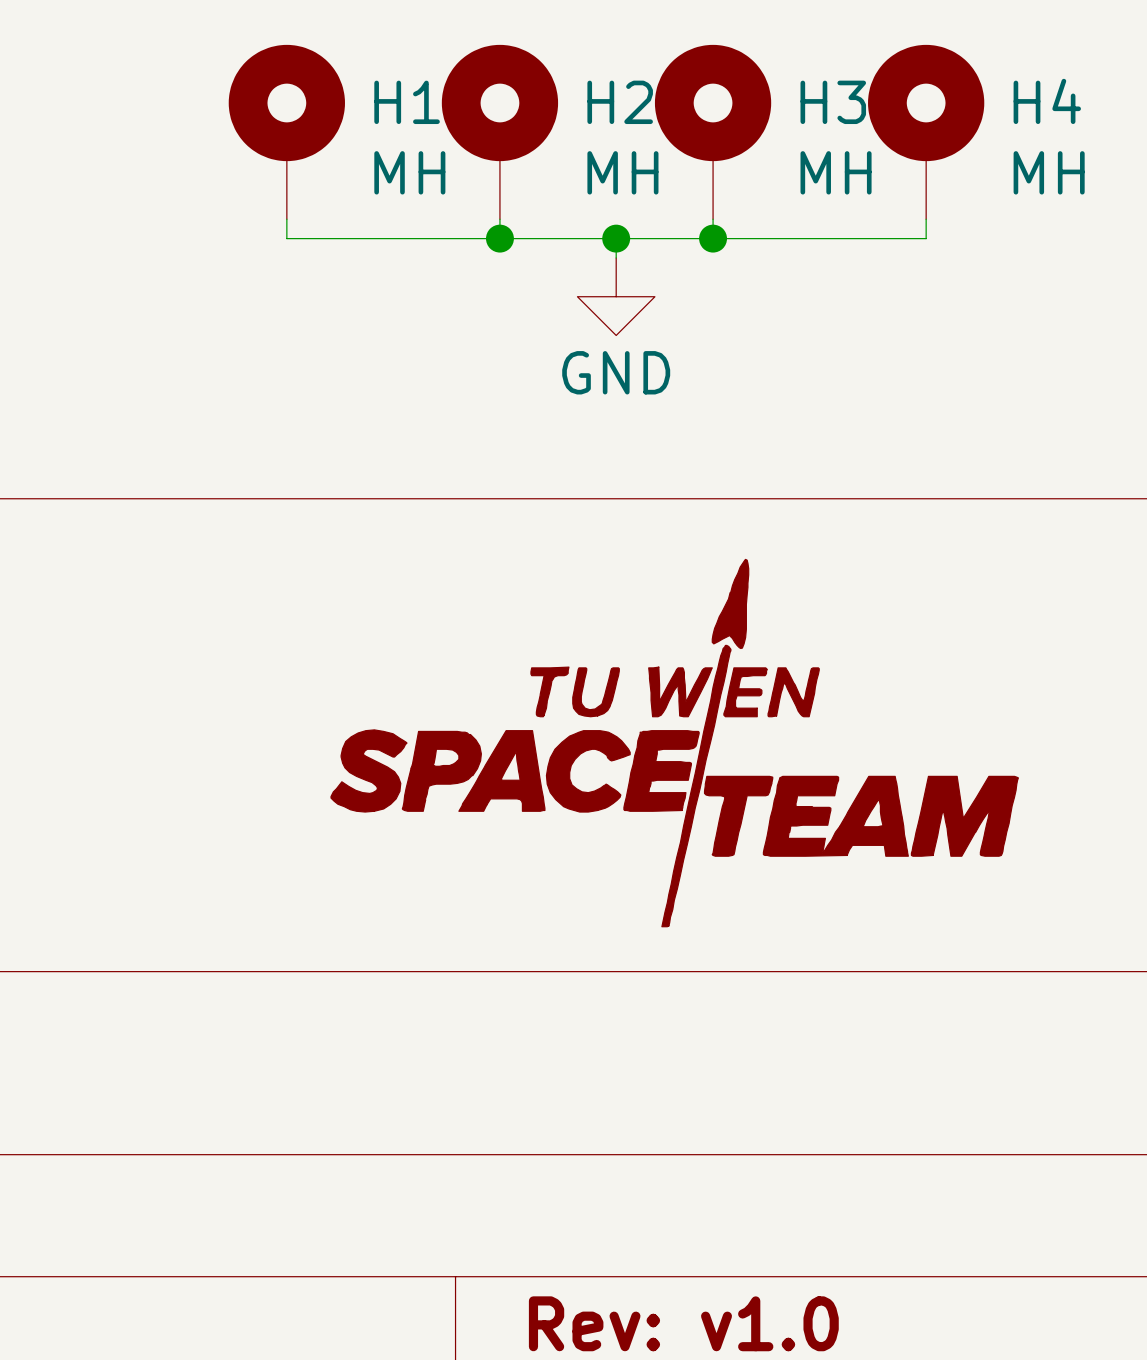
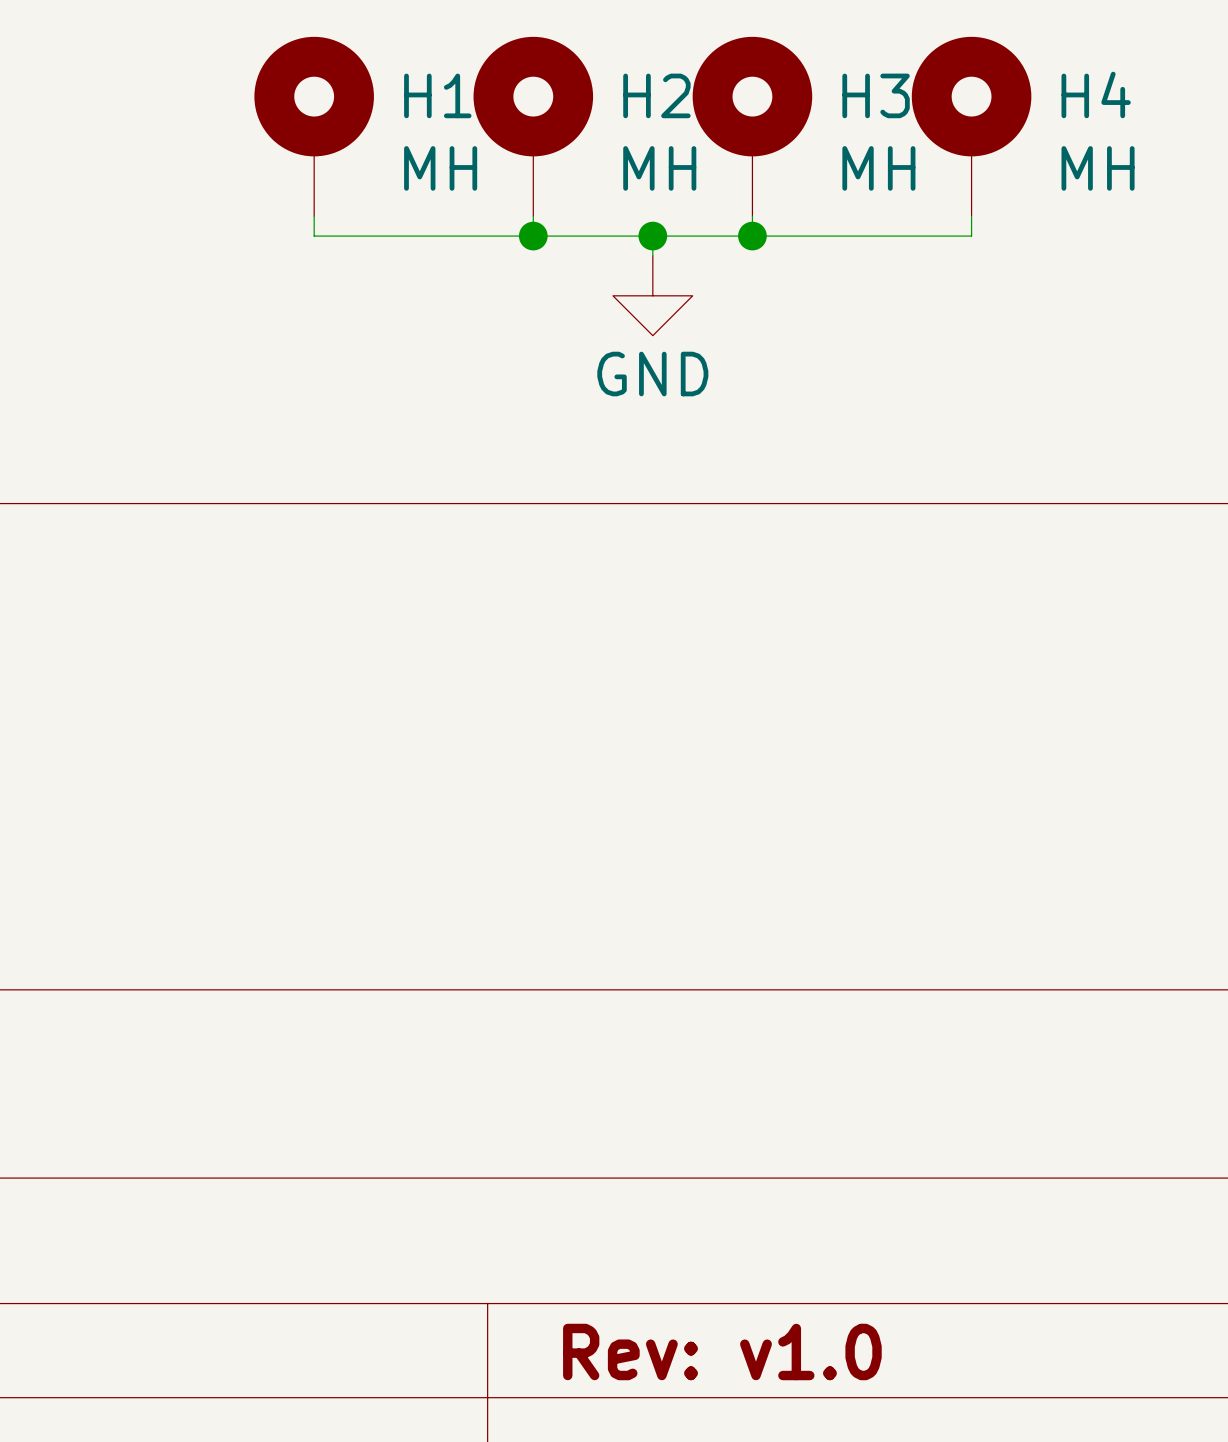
part: (674, 743) -> none

